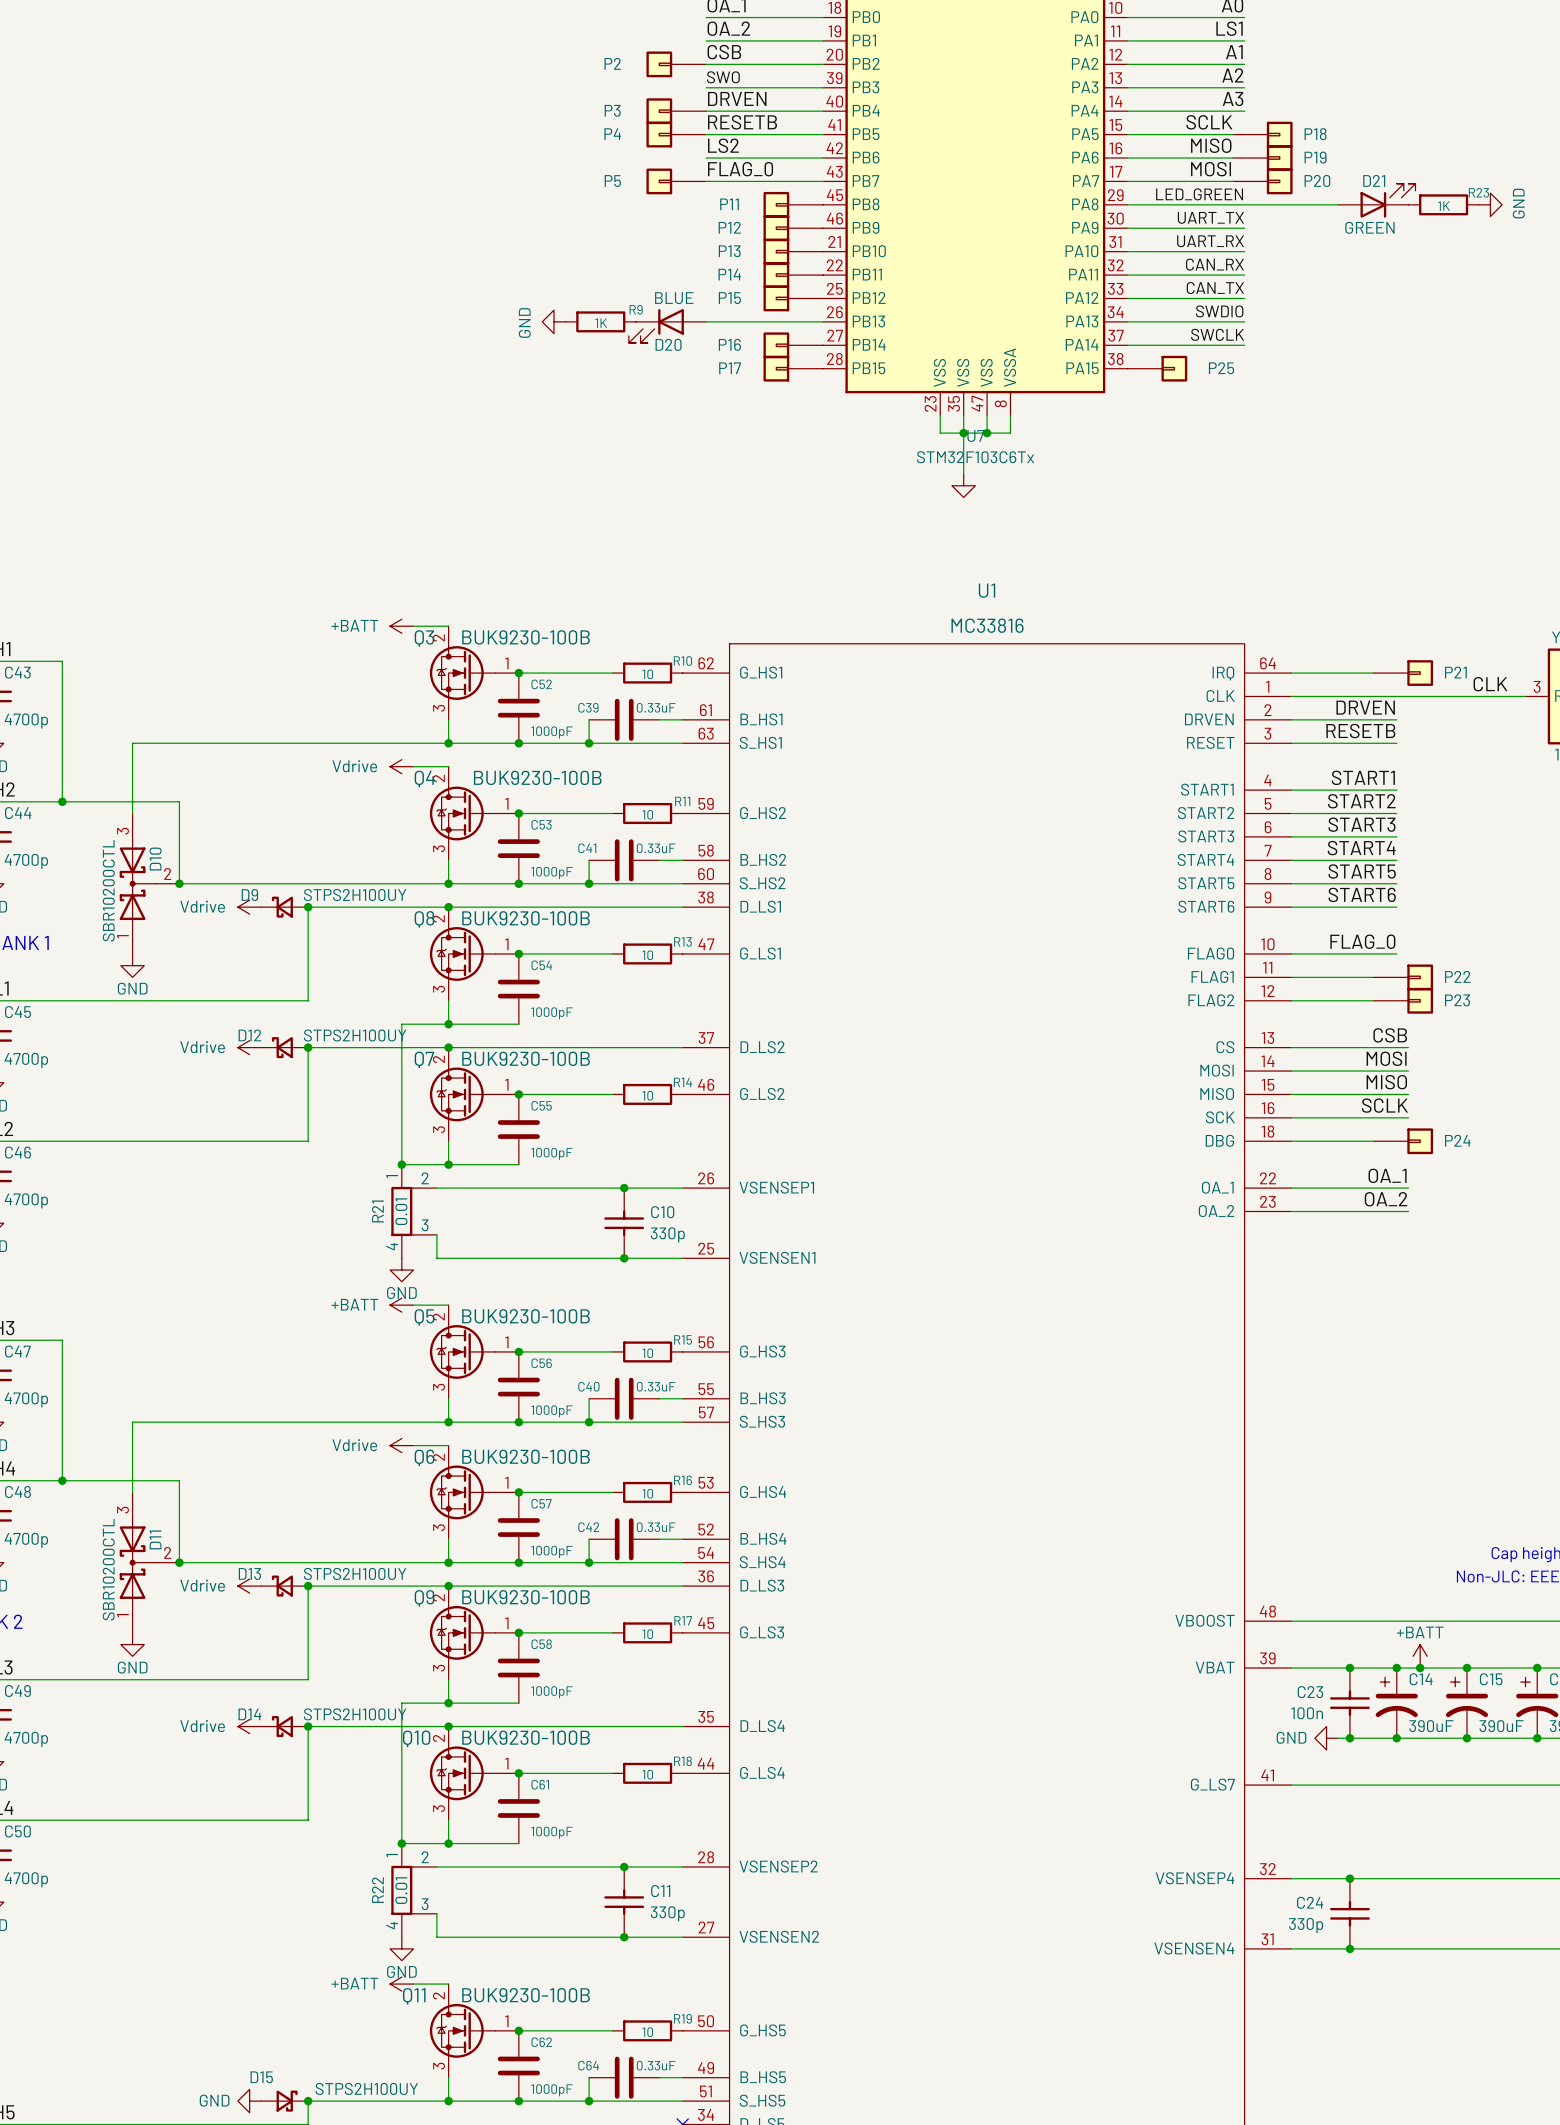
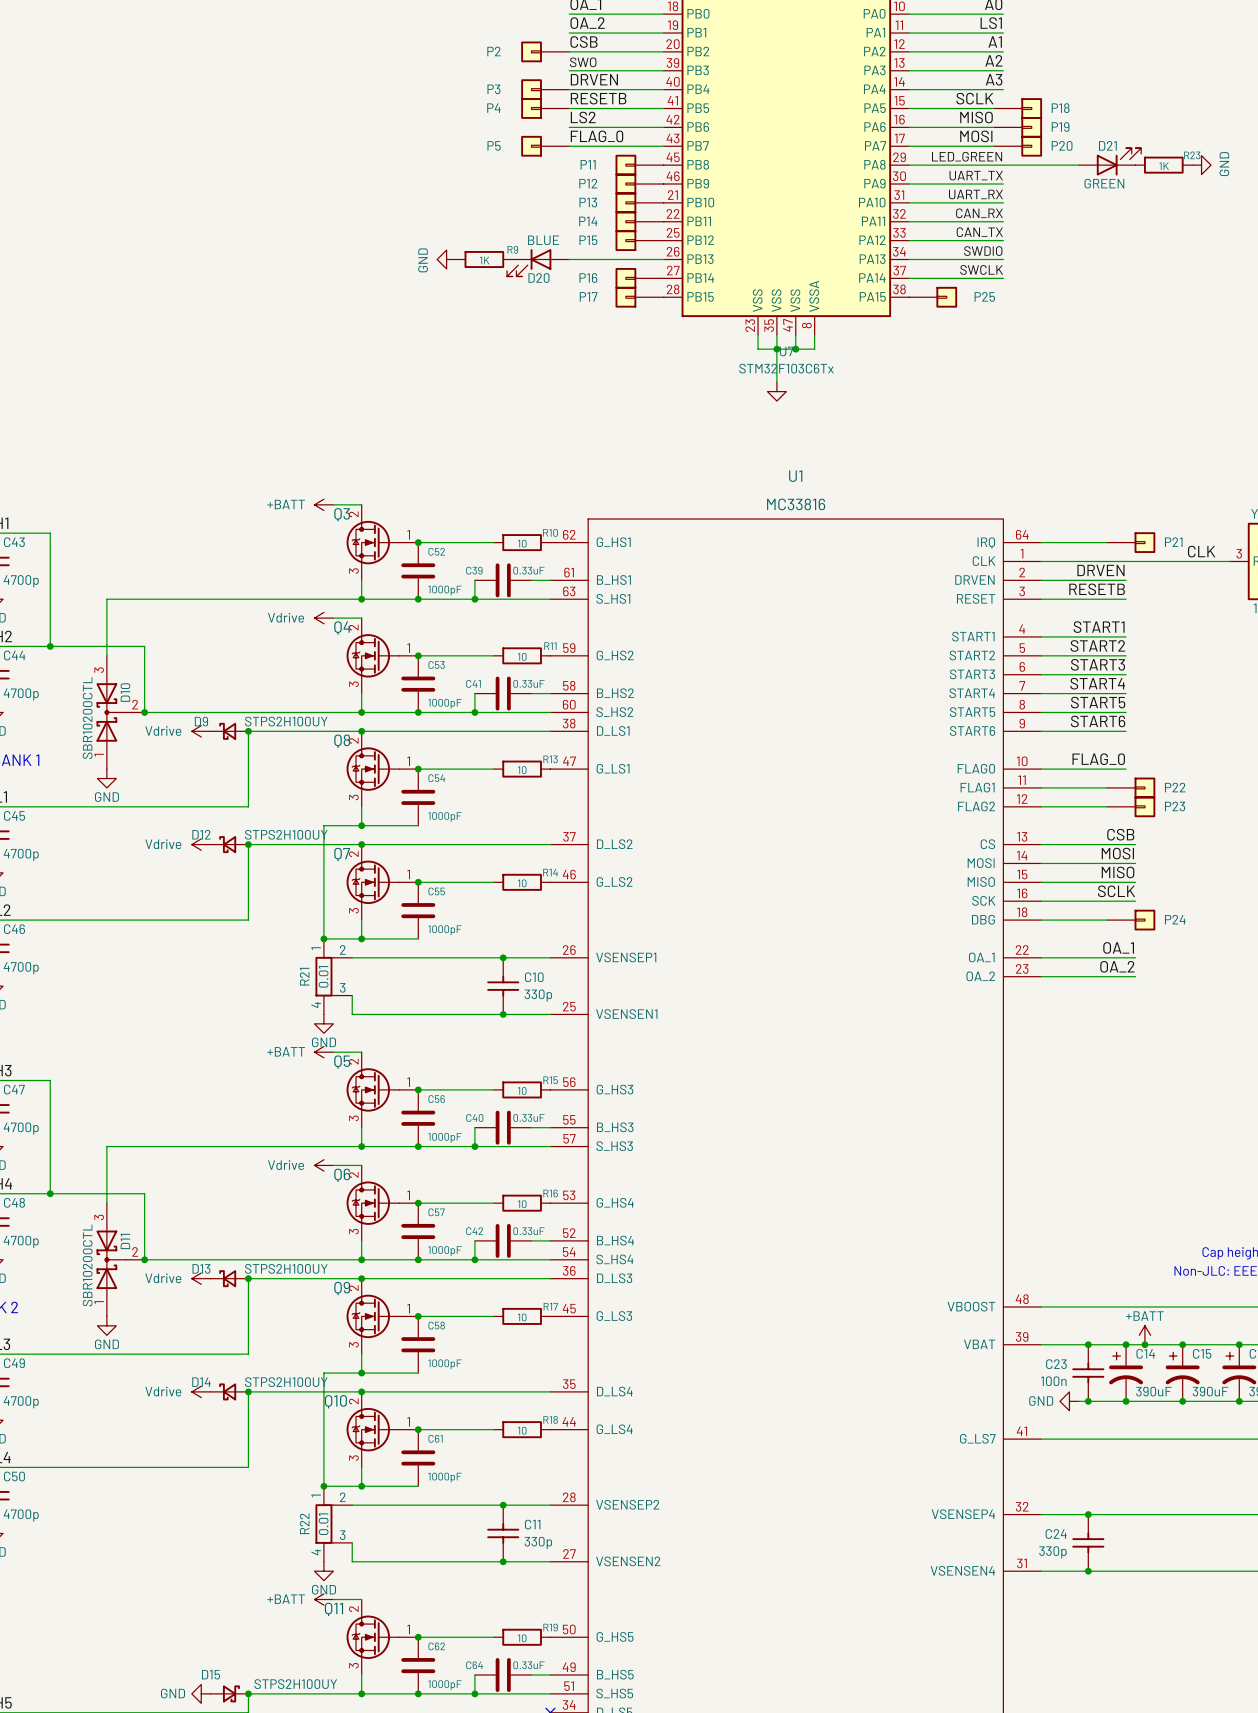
Q3 value: BUK9230-100B (526, 637) -> none
Q4 value: BUK9230-100B (537, 777) -> none
Q8 value: BUK9230-100B (526, 918) -> none
Q7 value: BUK9230-100B (526, 1058) -> none
Q5 value: BUK9230-100B (526, 1316) -> none
Q6 value: BUK9230-100B (526, 1456) -> none
Q9 value: BUK9230-100B (526, 1597) -> none
Q10 value: BUK9230-100B (526, 1737) -> none
Q11 value: BUK9230-100B (526, 1995) -> none

